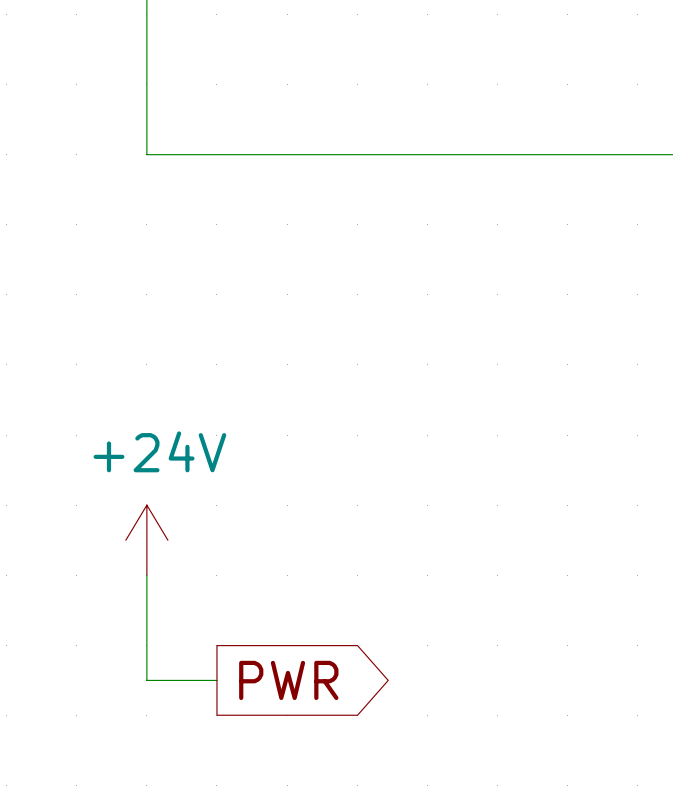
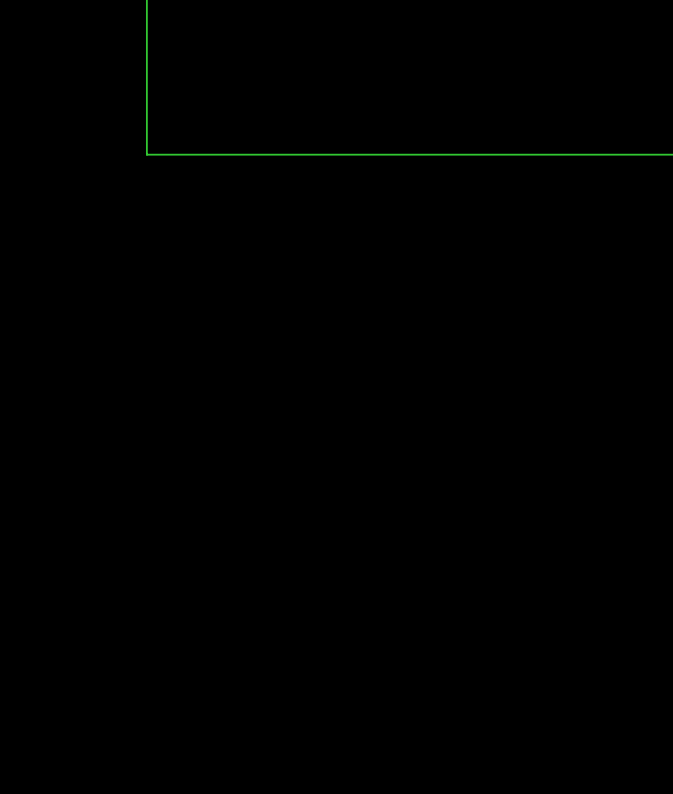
power symbol: +24V (146, 540) -> none
wire: (146, 575) (146, 680) (216, 680) -> none
global label: PWR (288, 680) -> none

